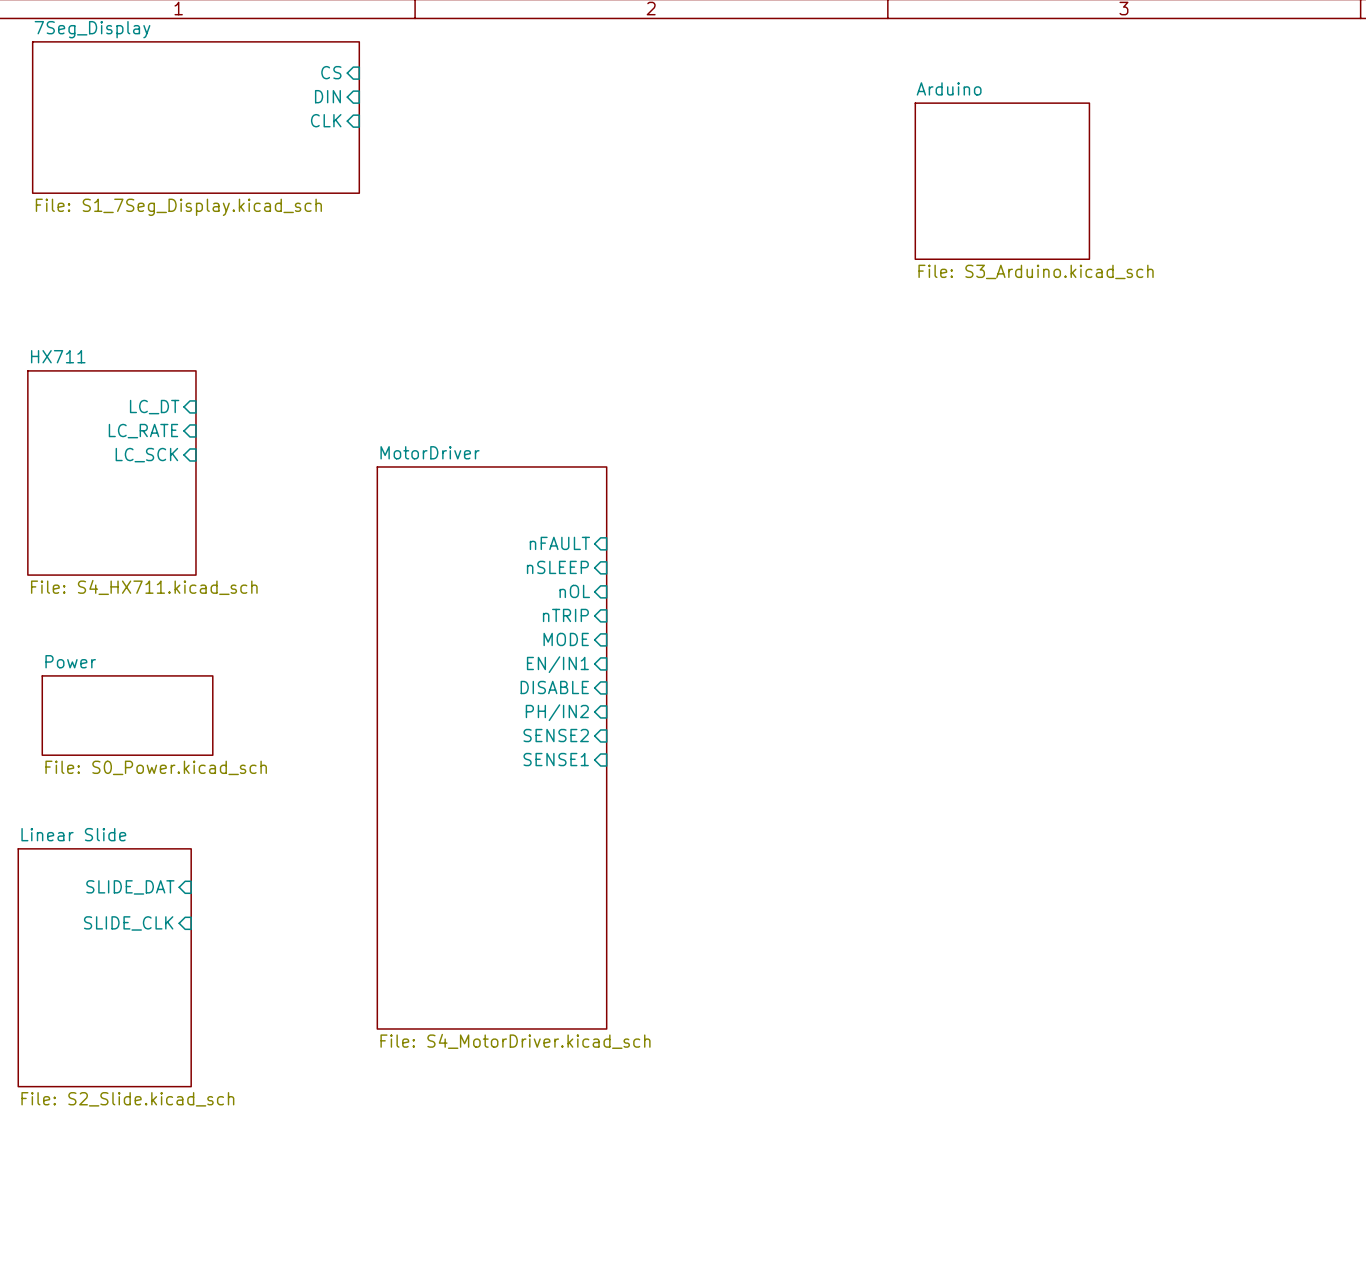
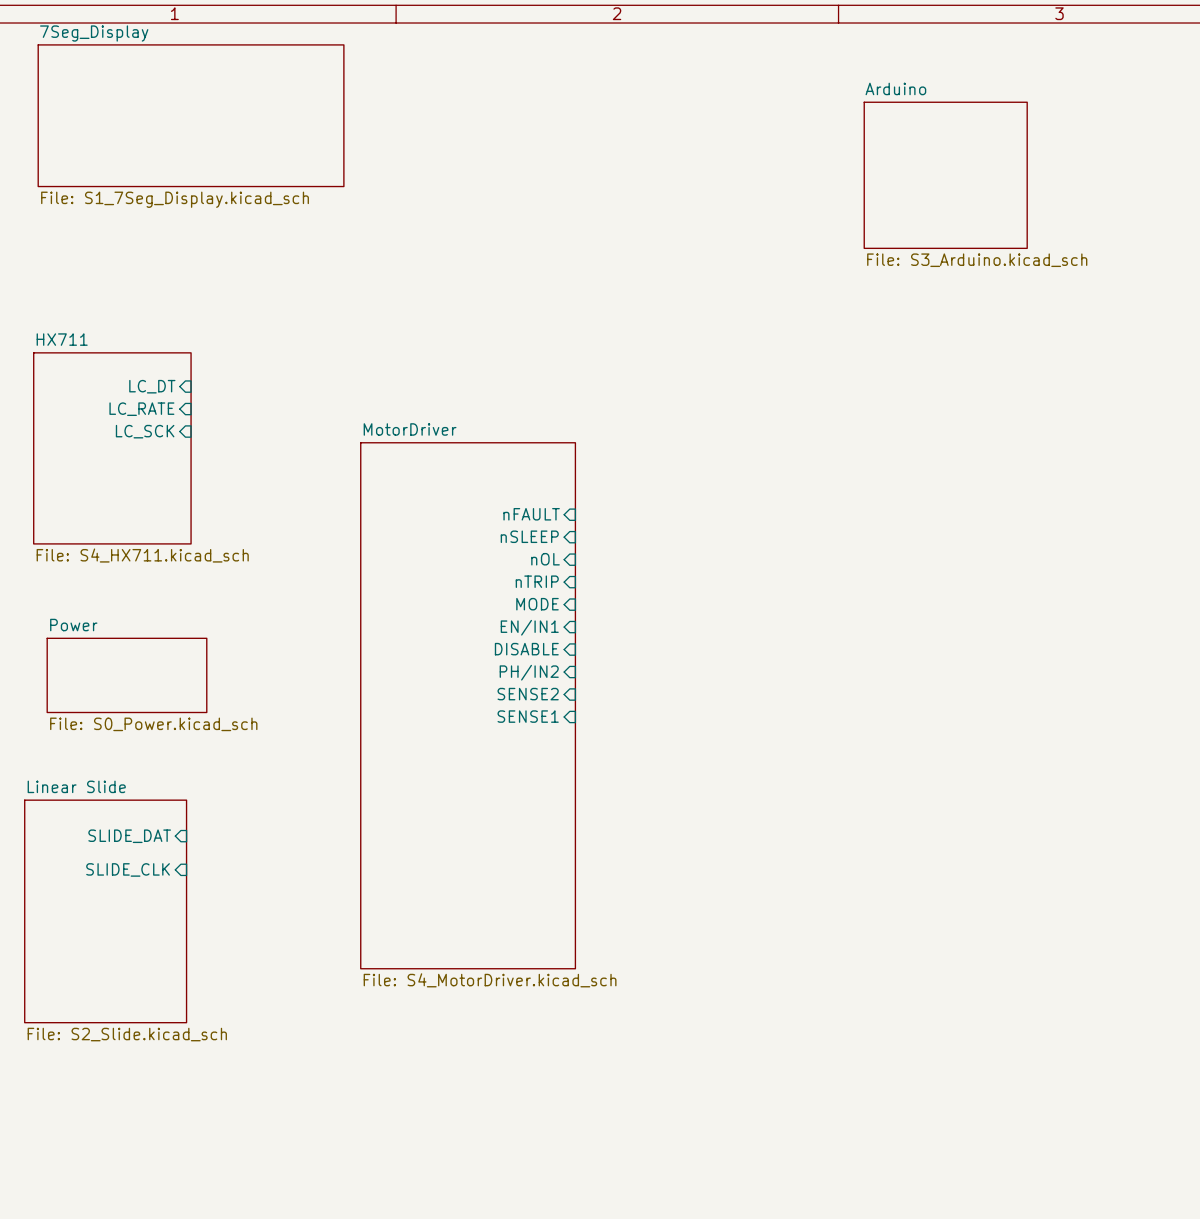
sheet pin: CS (331, 72) -> none
sheet pin: DIN (327, 96) -> none
sheet pin: CLK (326, 120) -> none

